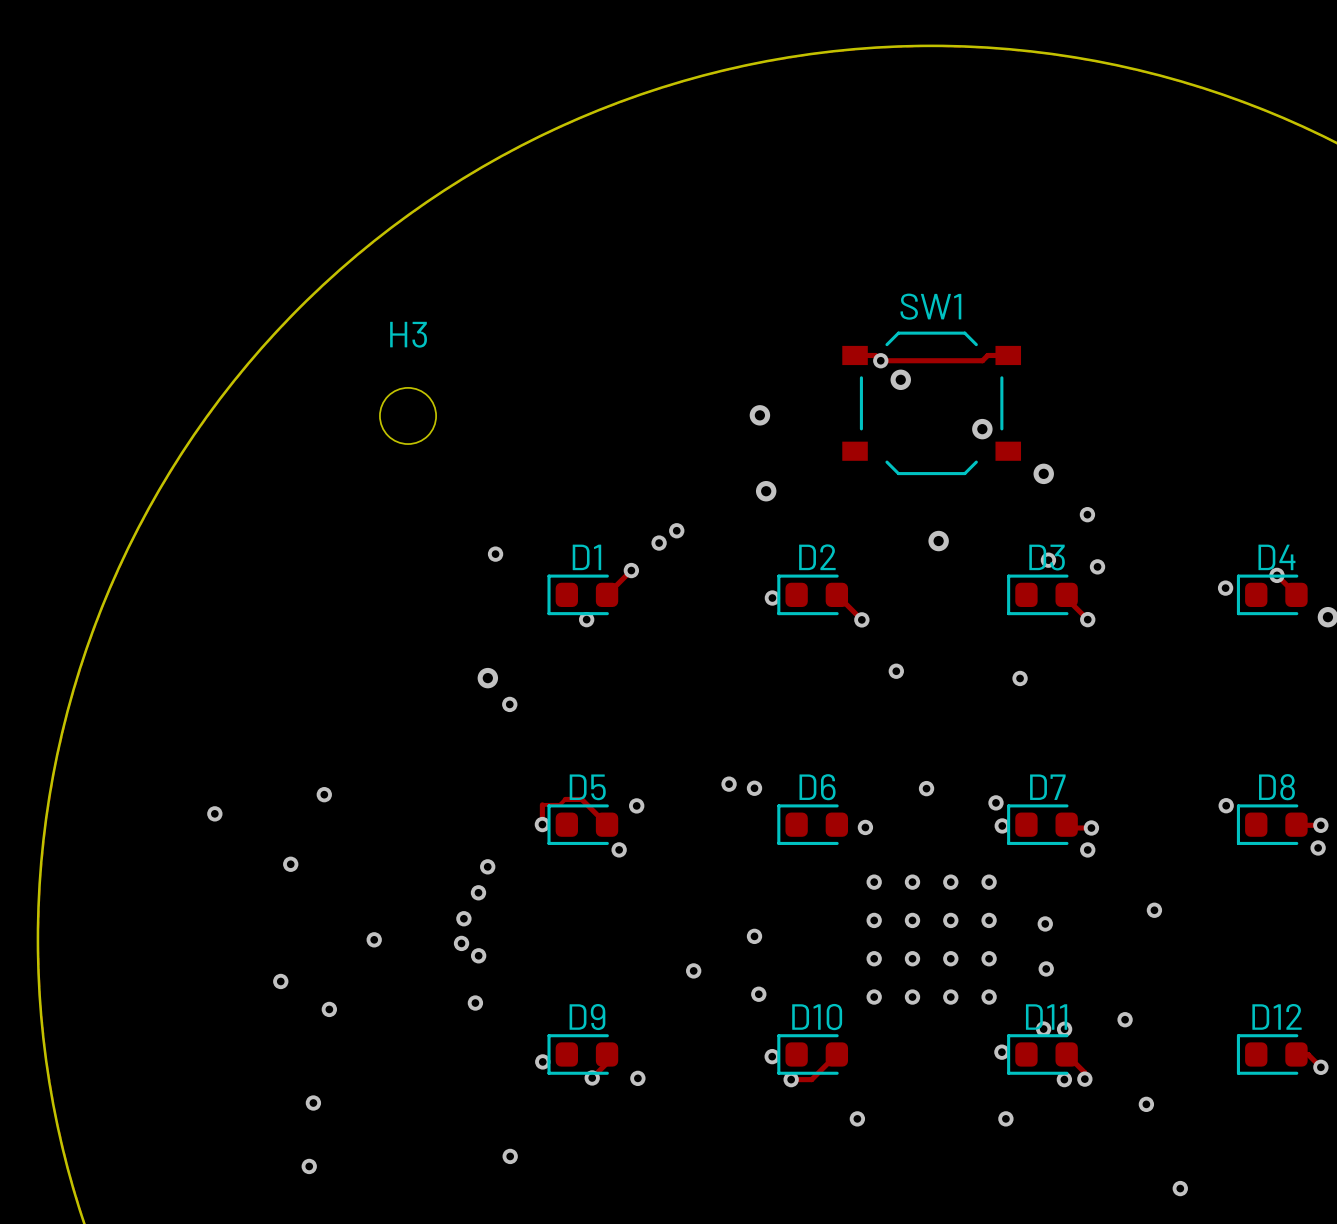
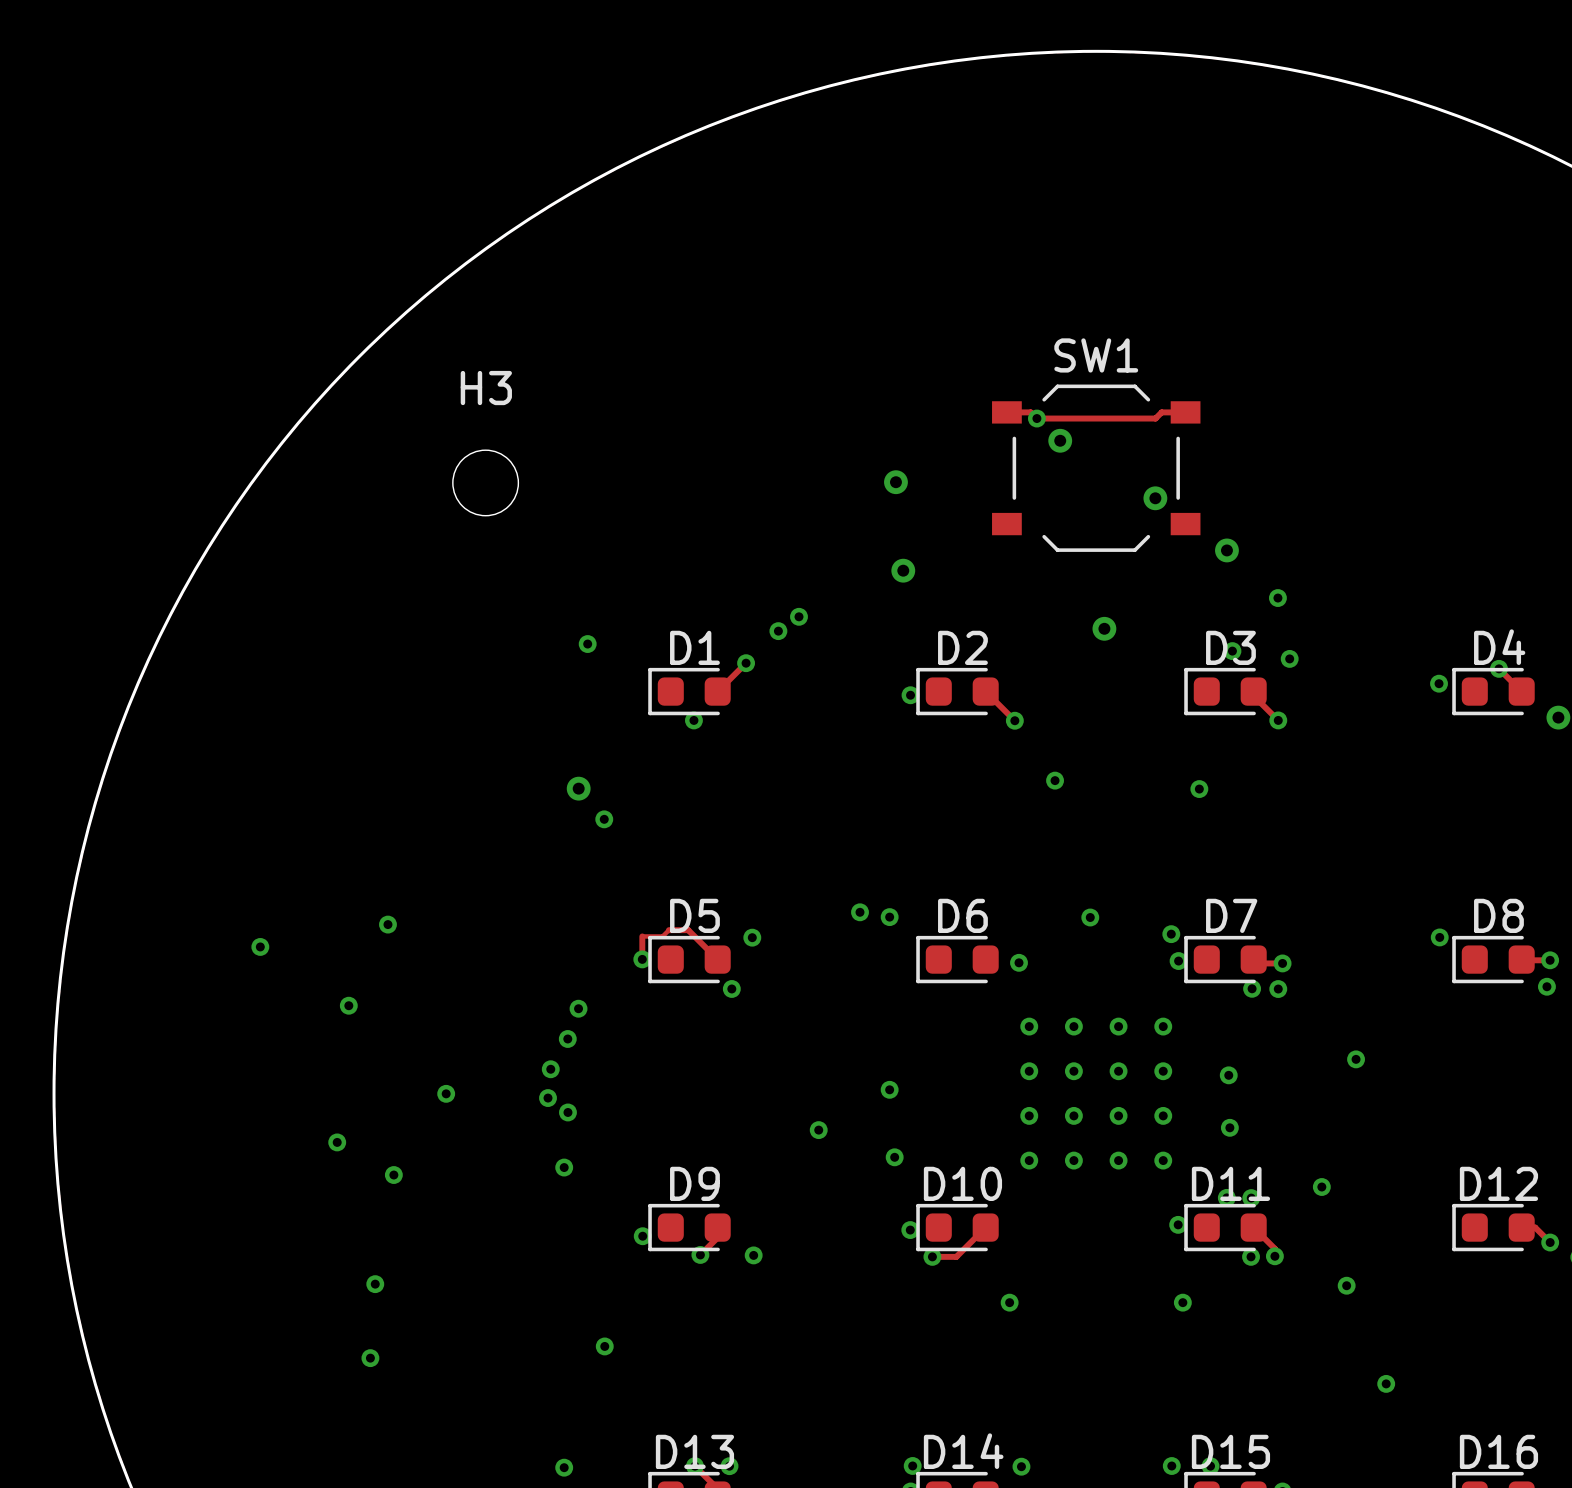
via: none -> (1252, 988)

